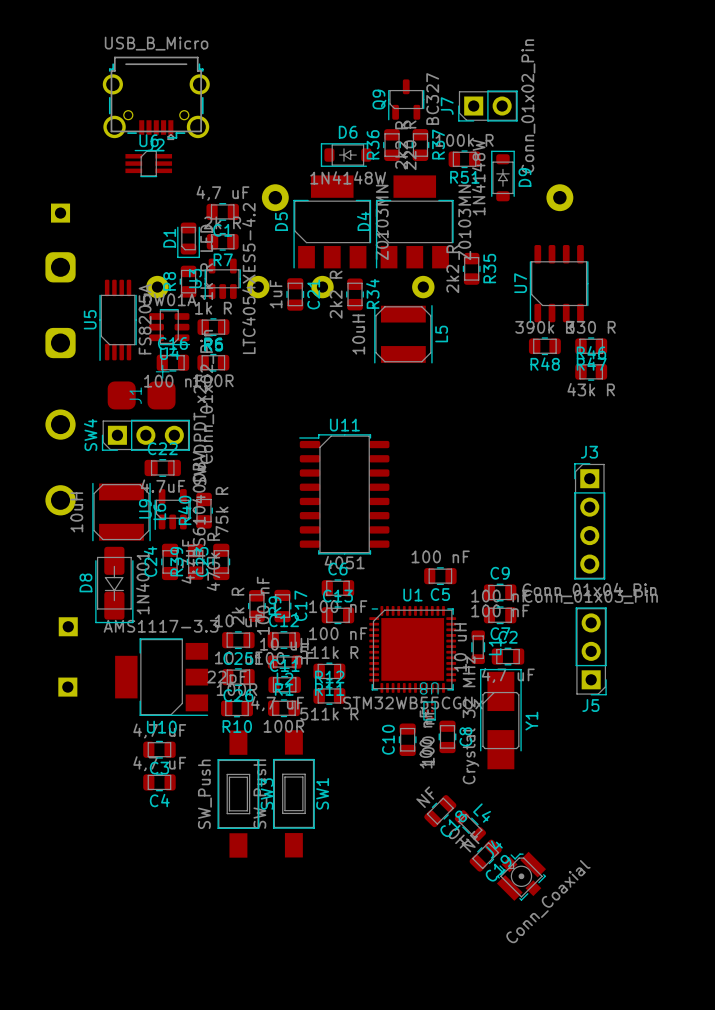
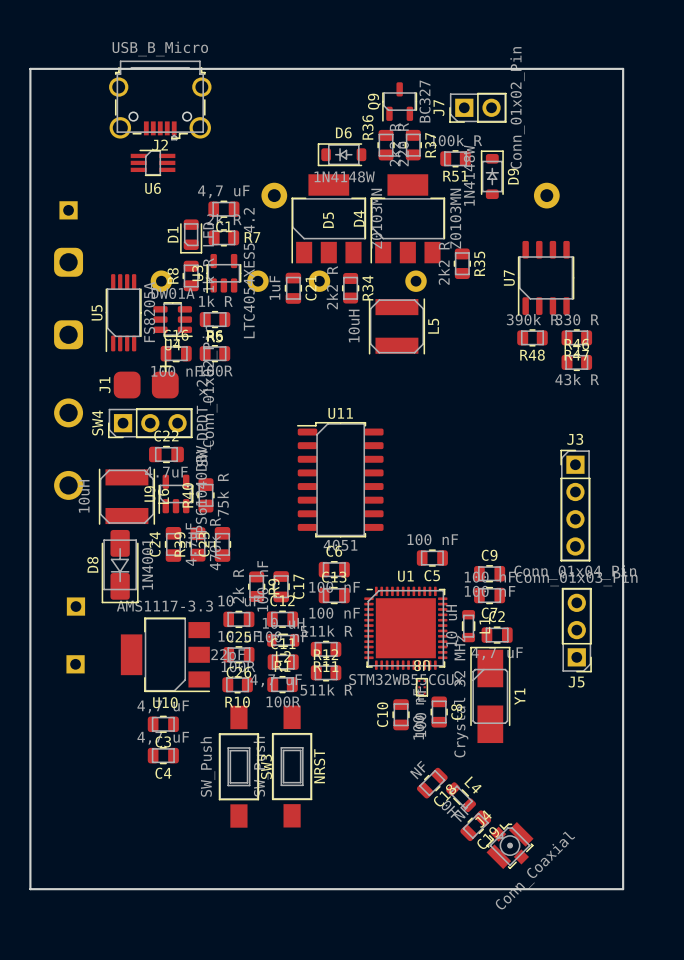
board edge: none -> (30, 68) (623, 68) (623, 889) (30, 889) (30, 68)
U6 name position: U6 (148, 140) -> U6 (153, 188)
R36 name position: R36 (373, 144) -> R36 (367, 127)
D5 name position: D5 (281, 221) -> D5 (328, 220)
R7 name position: R7 (223, 259) -> R7 (252, 237)
J1 name position: J1 (135, 395) -> J1 (105, 385)
SW1 name: SW1 (322, 793) -> NRST (319, 766)

